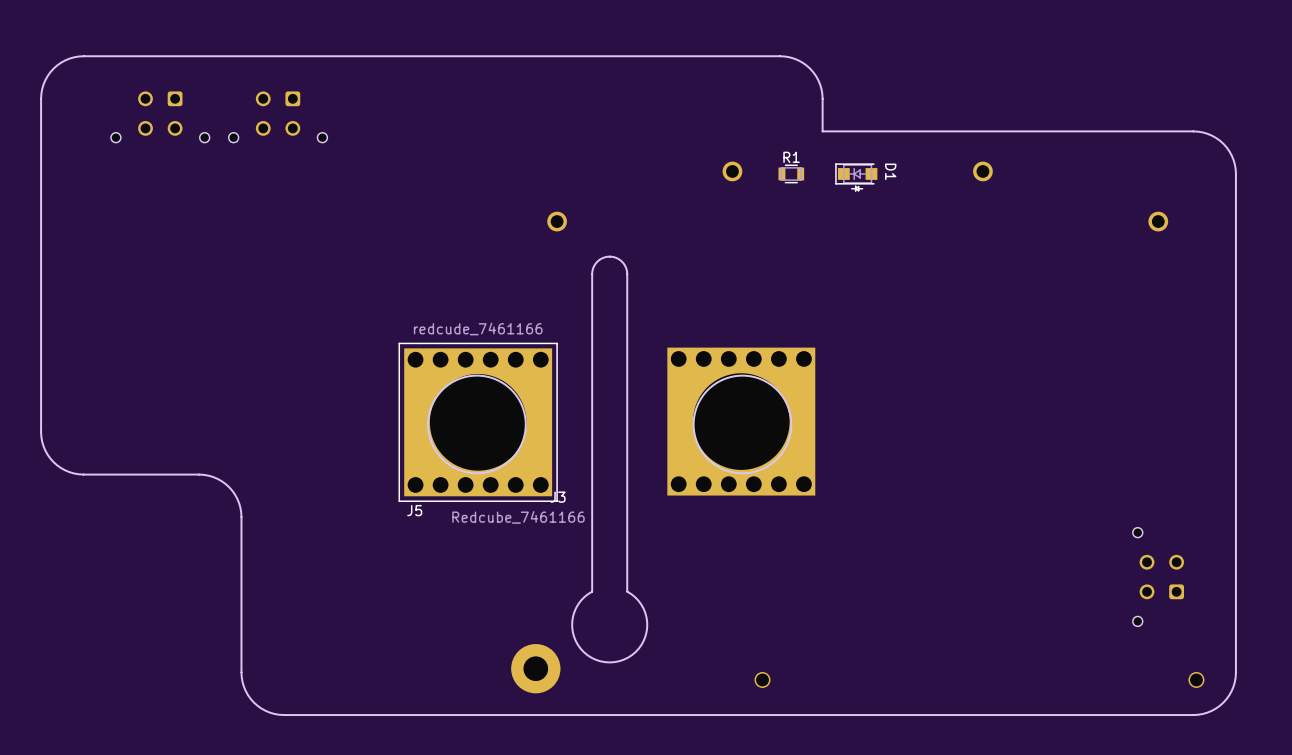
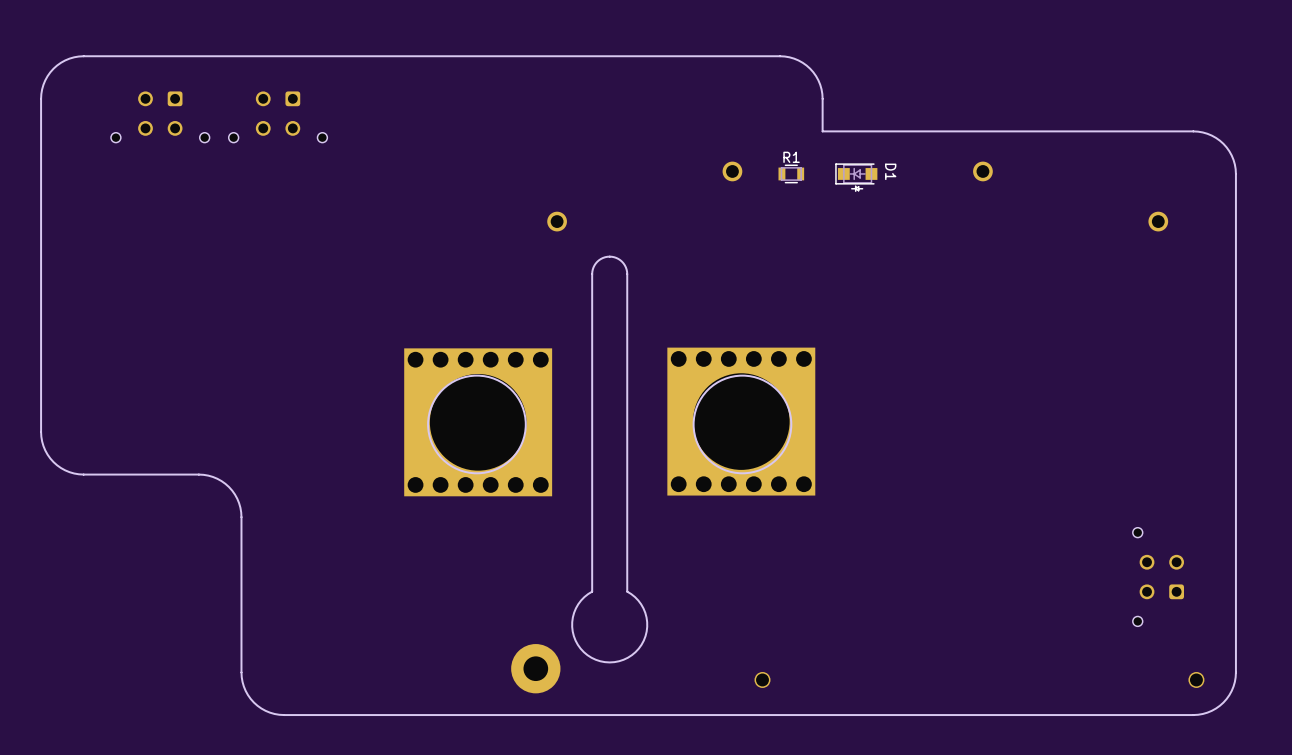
J5 side: bottom (478, 422) -> top (478, 422)

